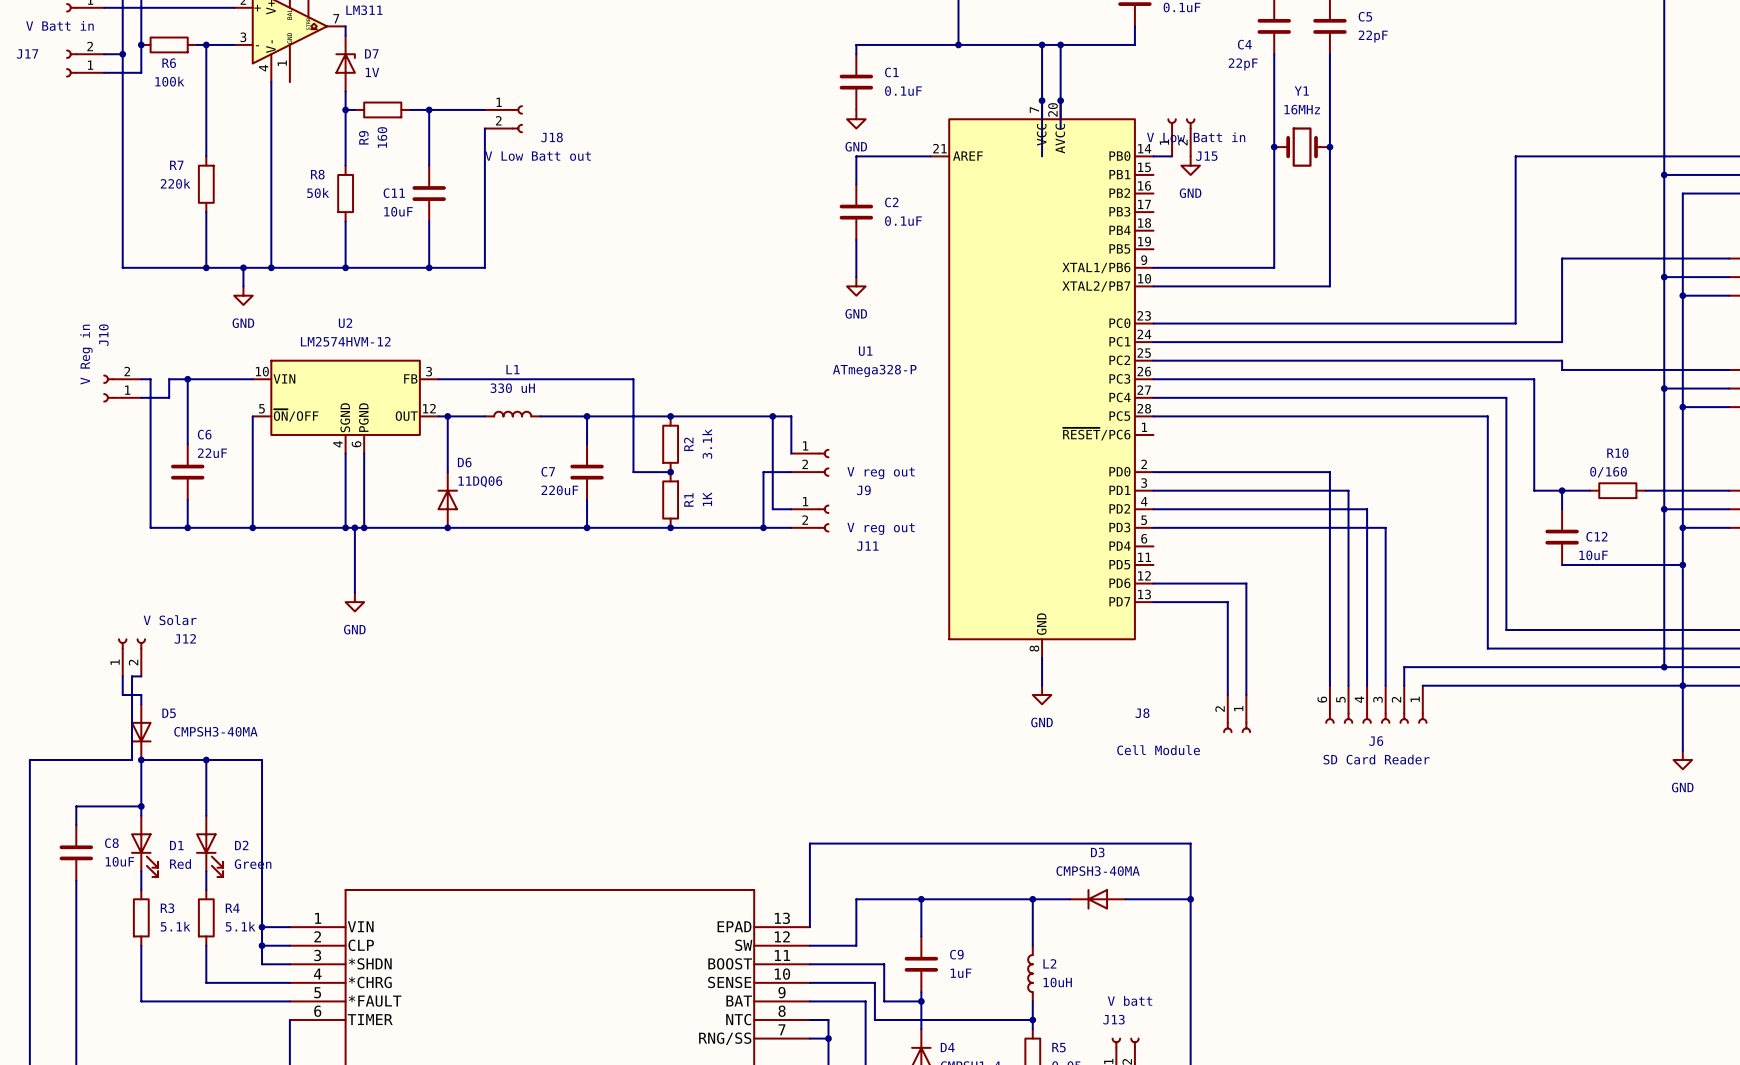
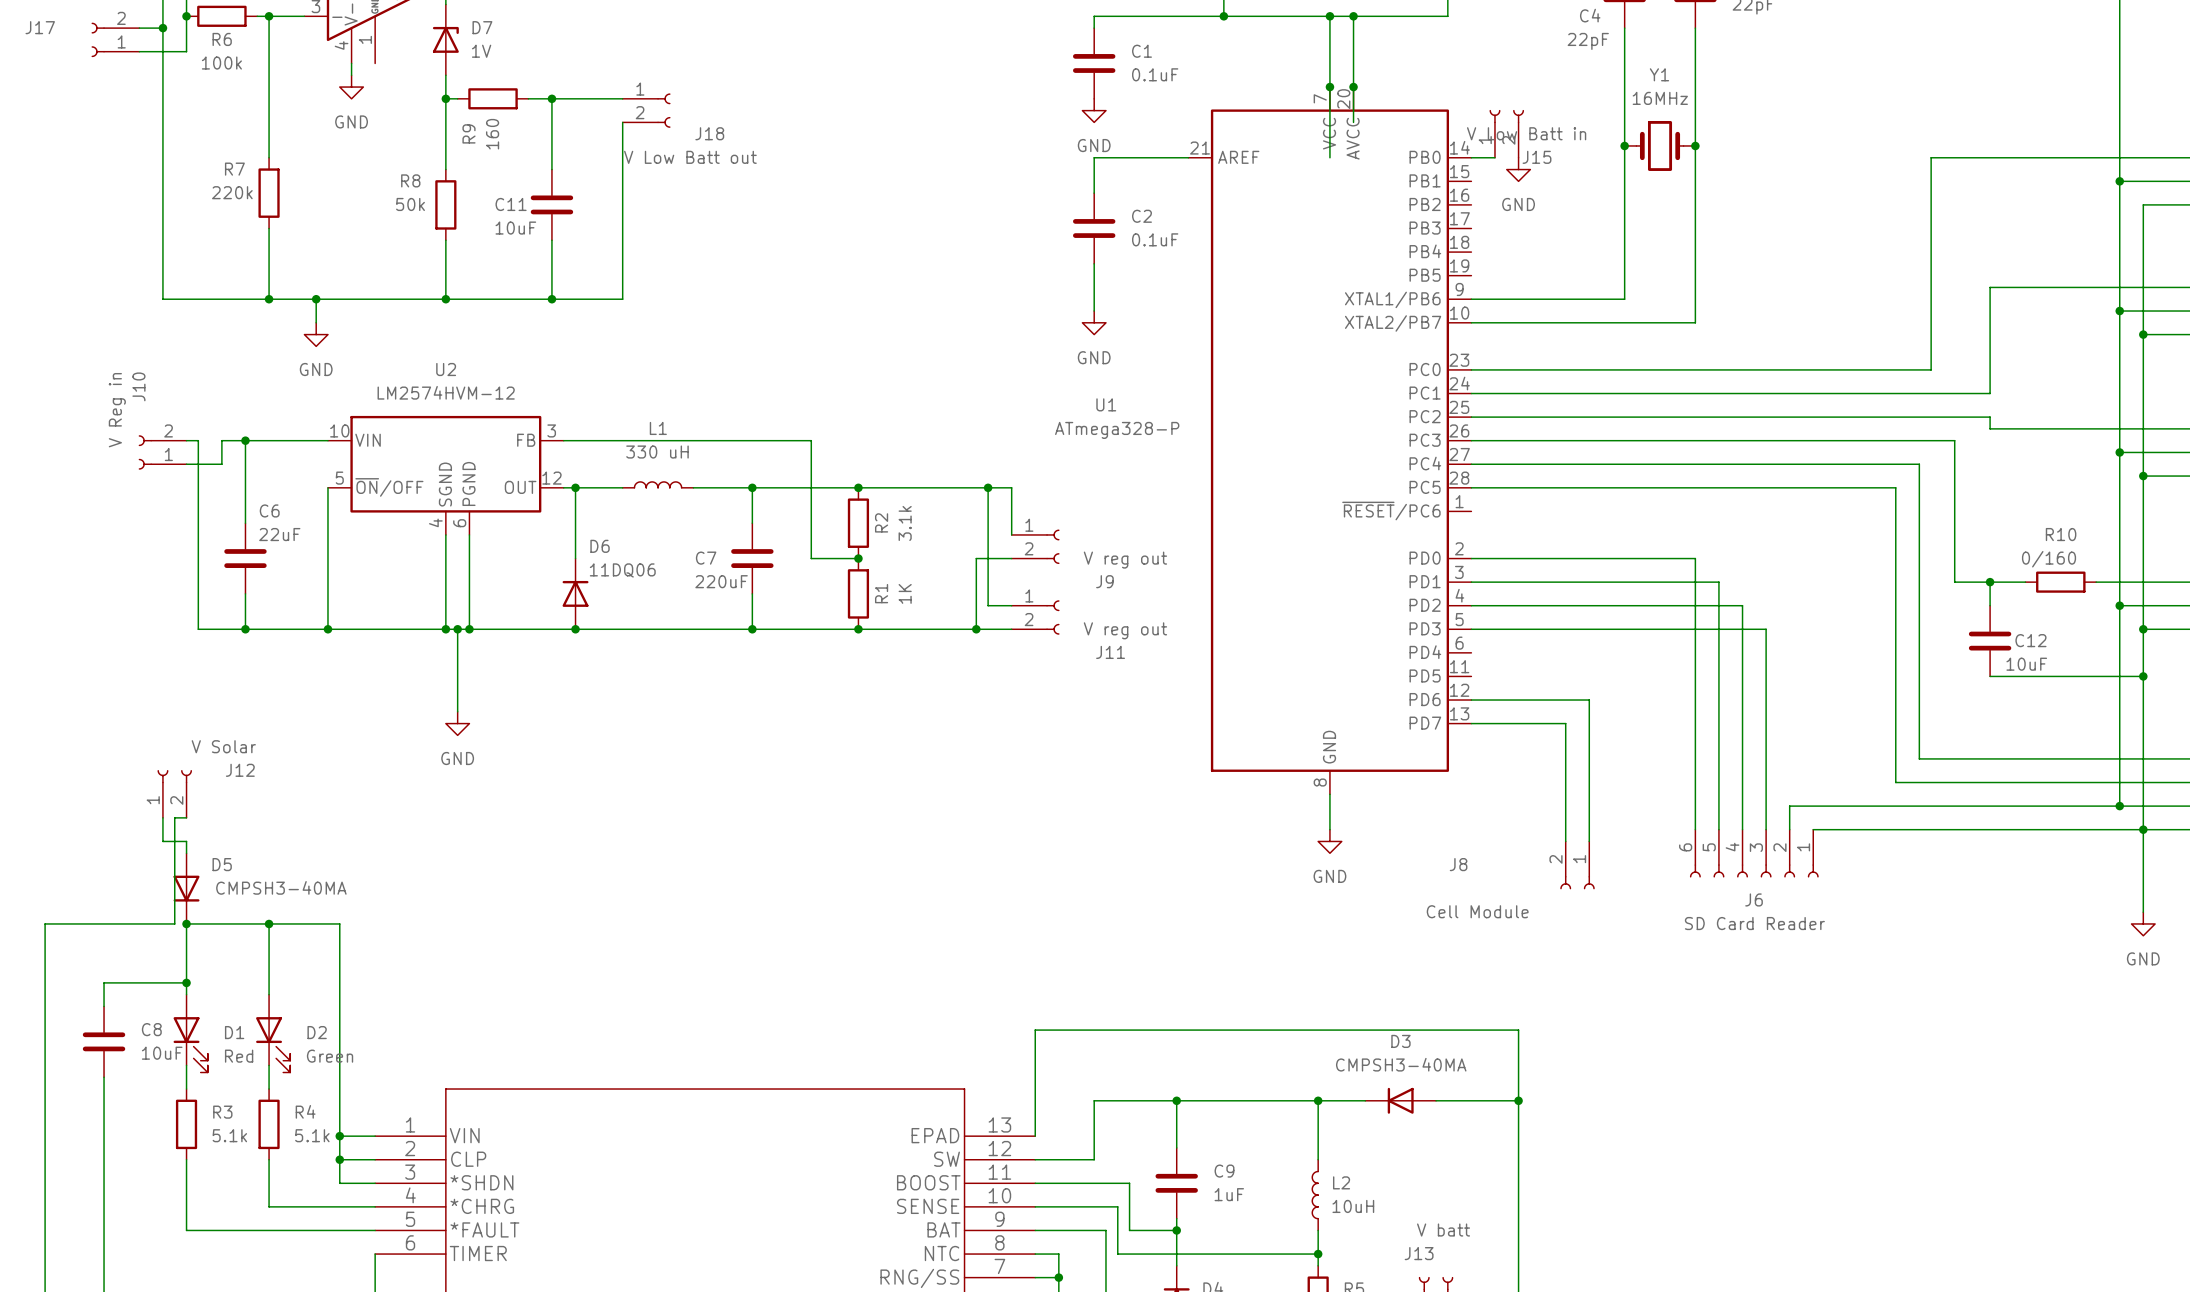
wire: (271, 91) (271, 267) -> none
power symbol: none -> GND (351, 87)
junction: (271, 267) -> none

